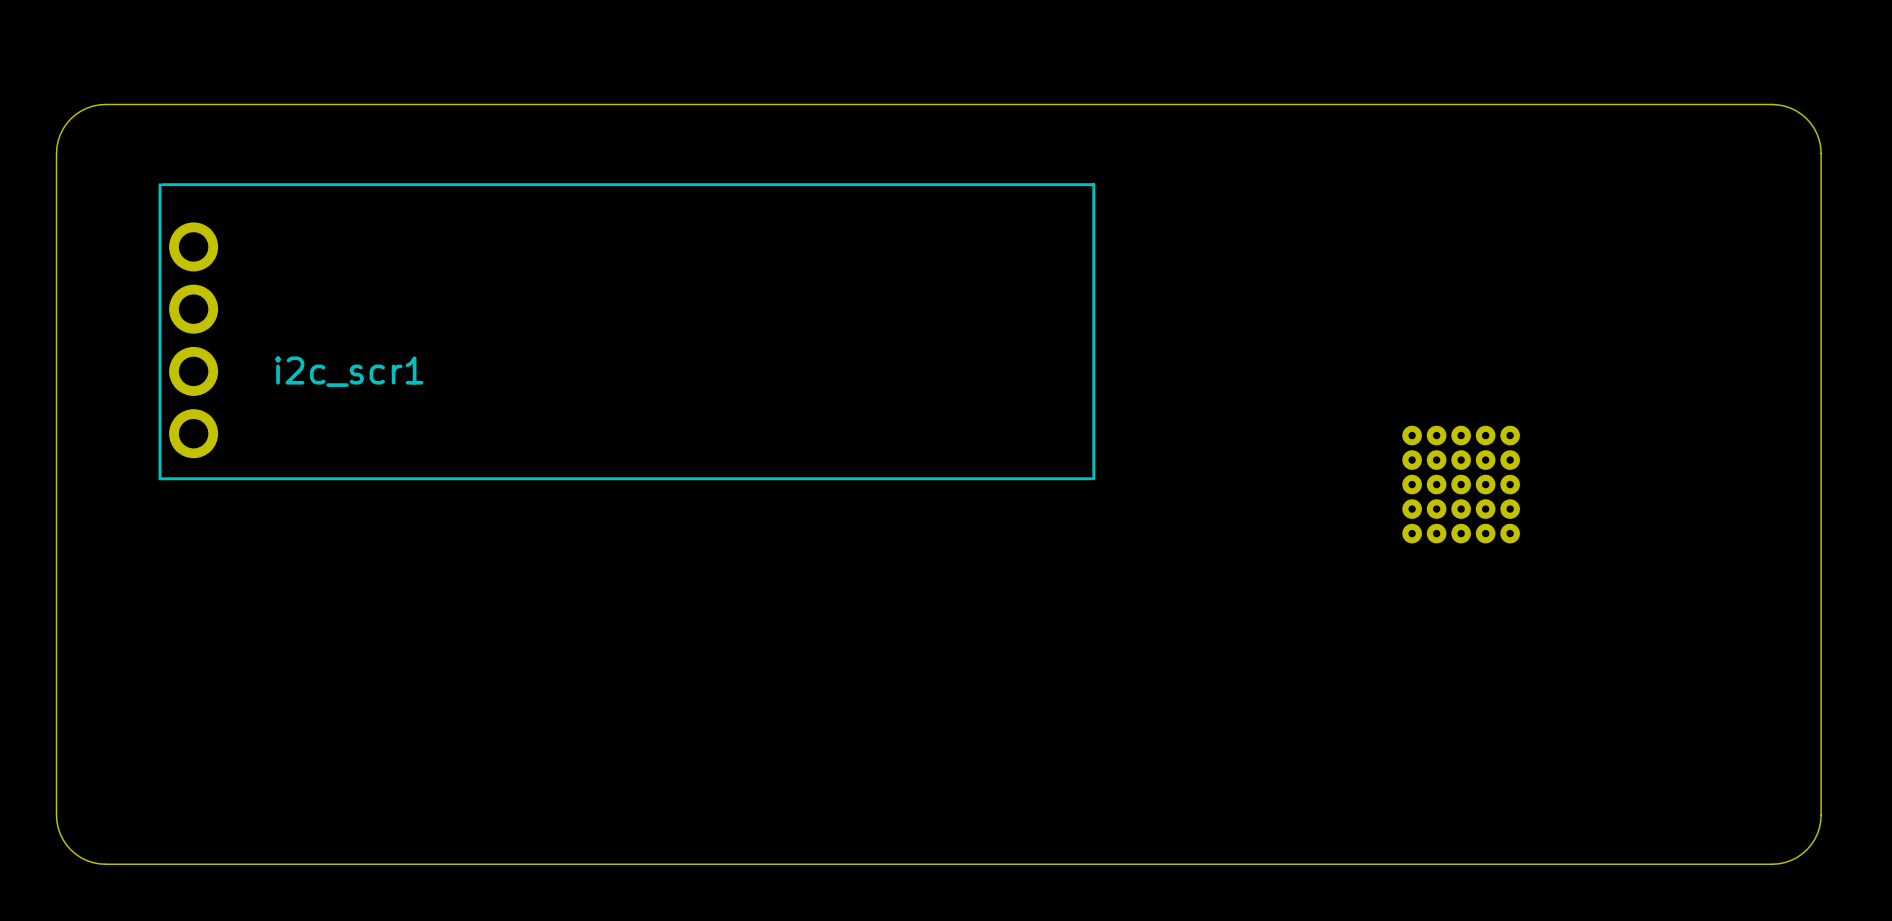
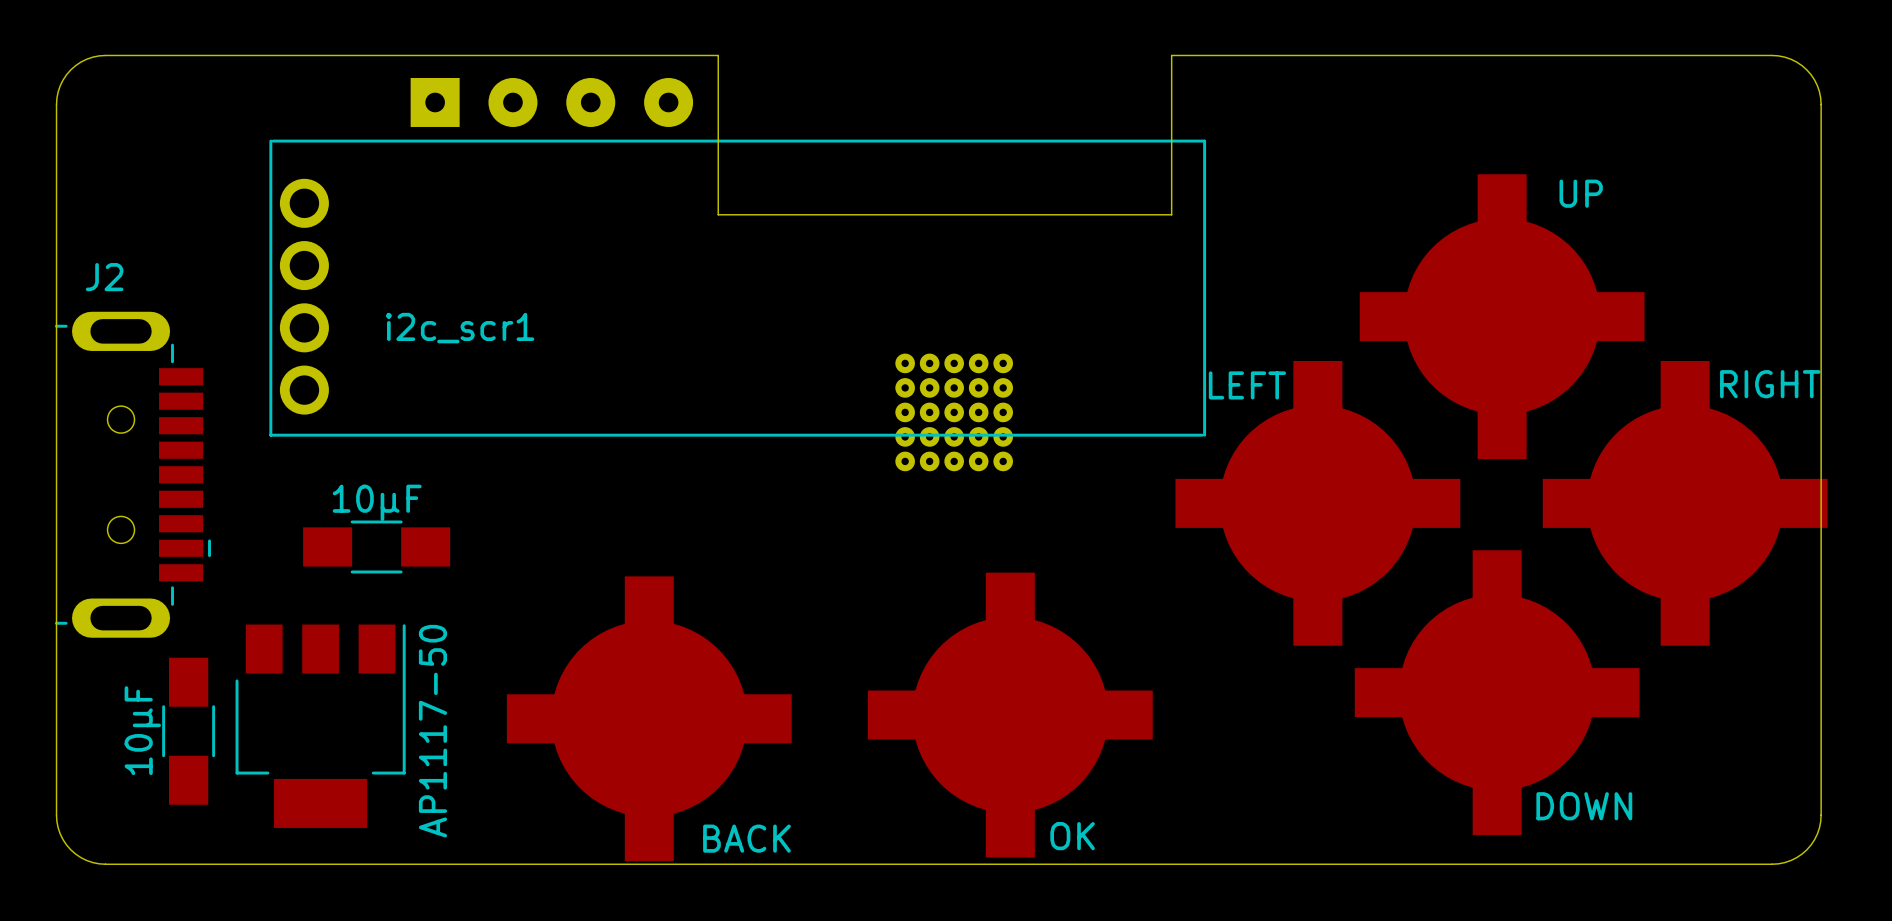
part: none -> (551, 102)
board edge: (56, 153) (60, 134) (70, 118) (86, 108) (105, 104) (1772, 104) (1790, 108) (1806, 118) (1817, 134) (1821, 153) -> (56, 153) (56, 98) (63, 79) (70, 69) (81, 62) (92, 57) (105, 55) (718, 55) (718, 214) (1171, 214) (1171, 55) (1778, 55) (1790, 59) (1801, 65) (1811, 74) (1817, 85) (1821, 104) (1821, 153)
UP: none -> (1502, 316)
i2c_scr1 position: (626, 331) -> (737, 288)
J2: none -> (132, 474)
part position: (1461, 484) -> (954, 412)
LEFT: none -> (1317, 503)
RIGHT: none -> (1685, 503)
part: none -> 10µF (376, 546)
DOWN: none -> (1497, 692)
OK: none -> (1010, 715)
BACK: none -> (649, 718)
part: none -> AP1117-50 (320, 726)
part: none -> 10µF (188, 731)

